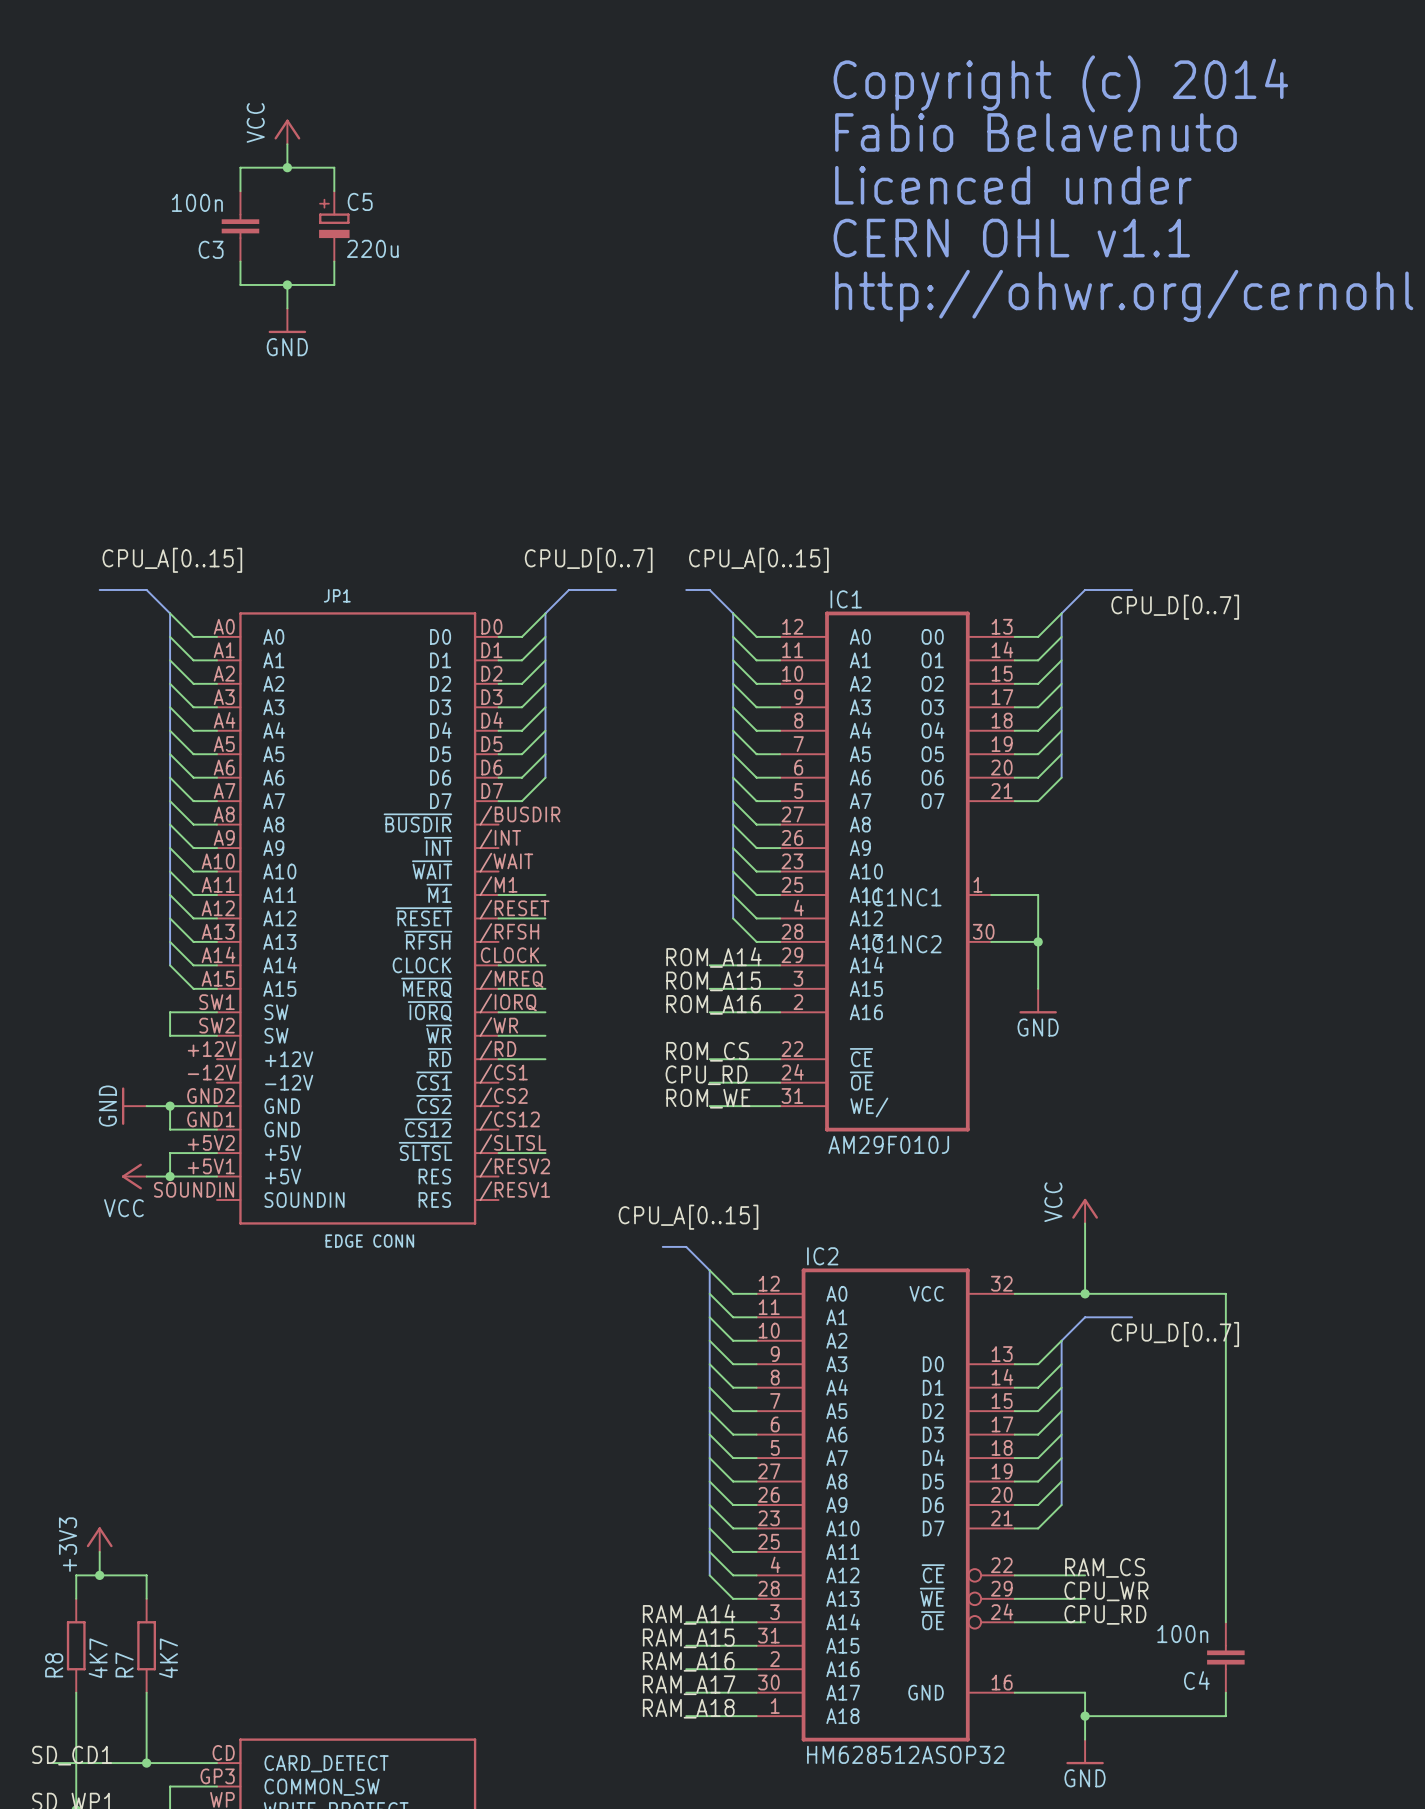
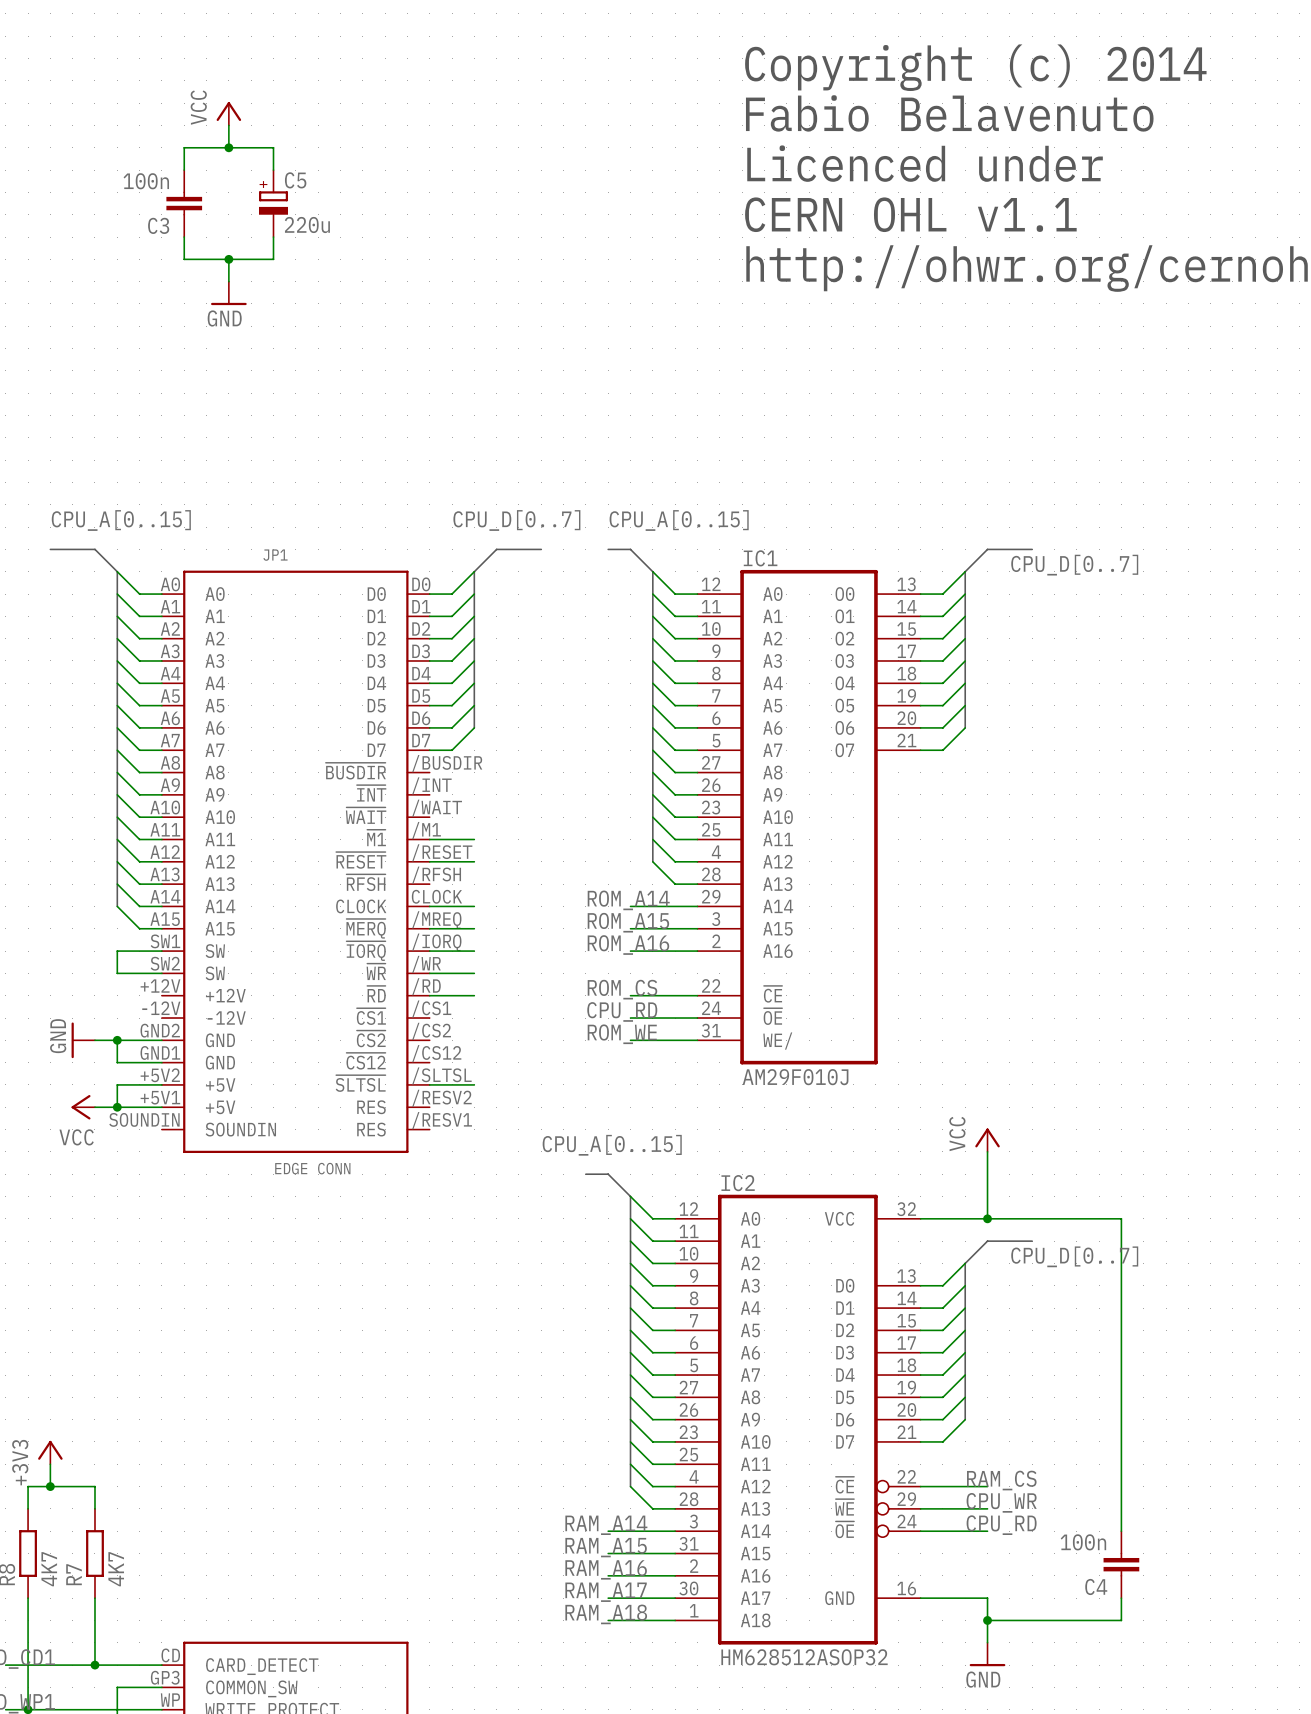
IC1NC1: (979, 894) -> none
wire: (991, 894) (1038, 894) (1038, 988) -> none
IC1NC2: (979, 941) -> none
wire: (991, 941) (1038, 941) -> none
junction: (1038, 941) -> none
power symbol: GND (1038, 1001) -> none

